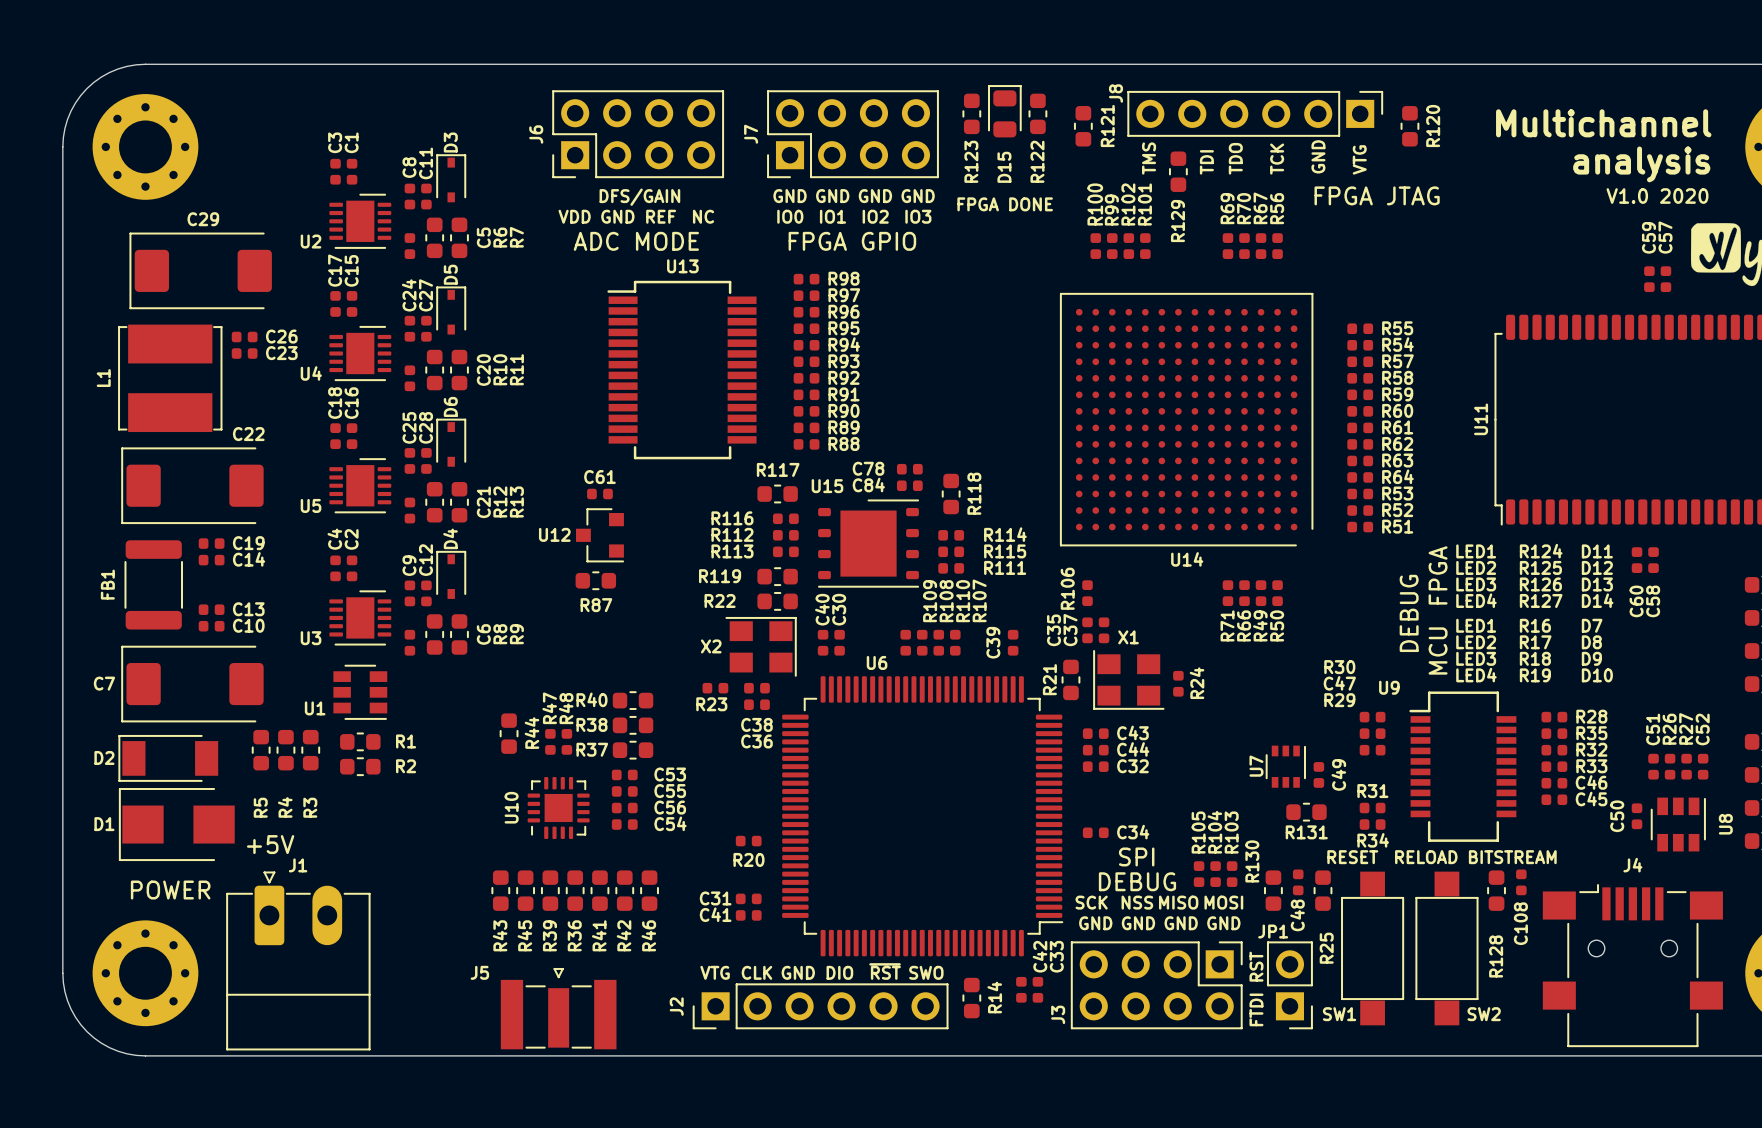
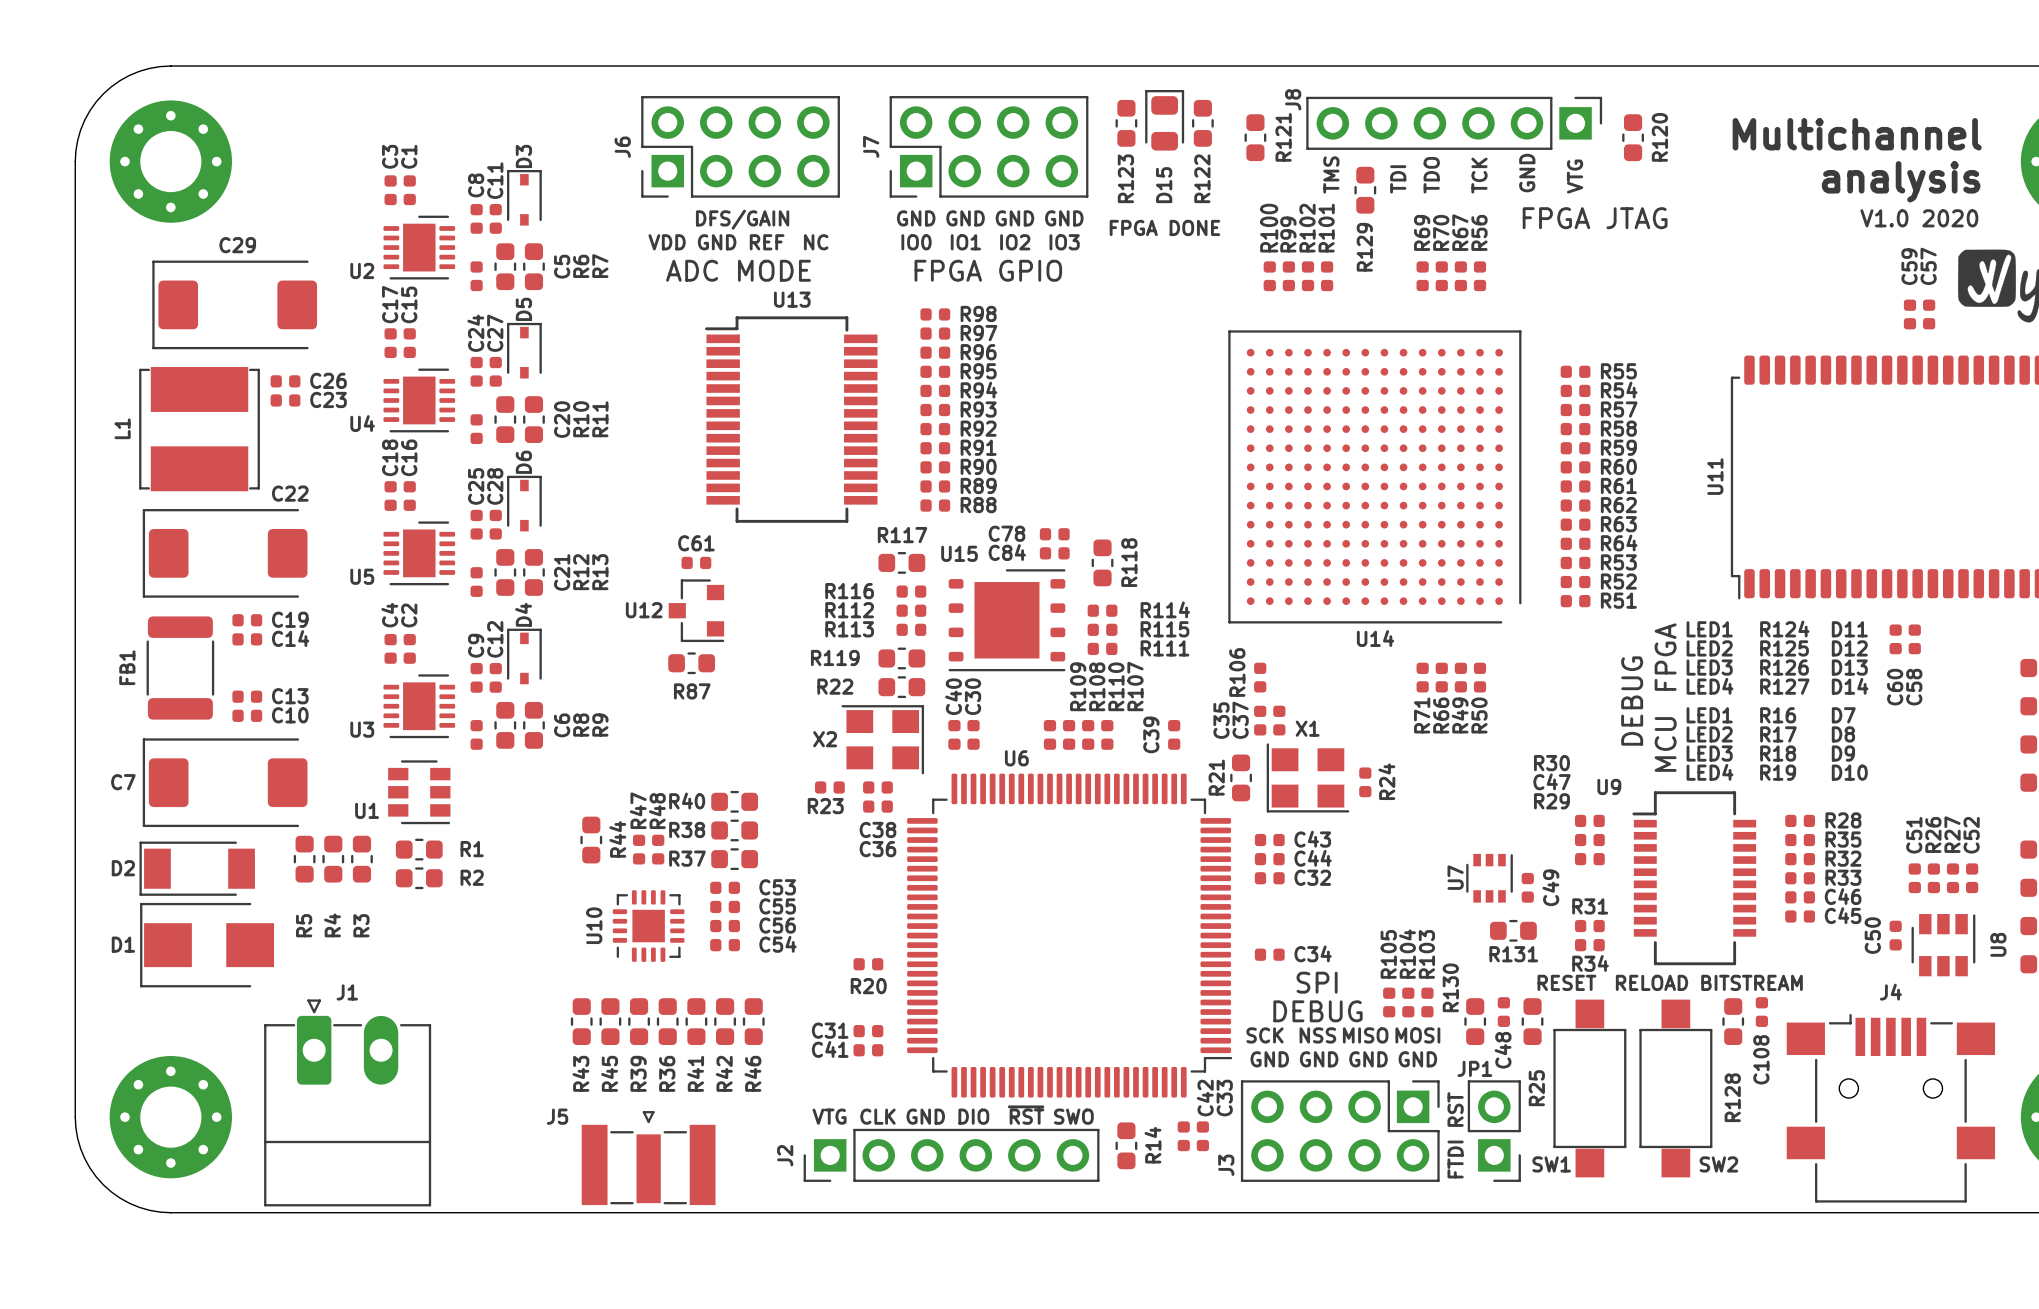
text: +5V (270, 844) -> none
text: POWER (170, 890) -> none

